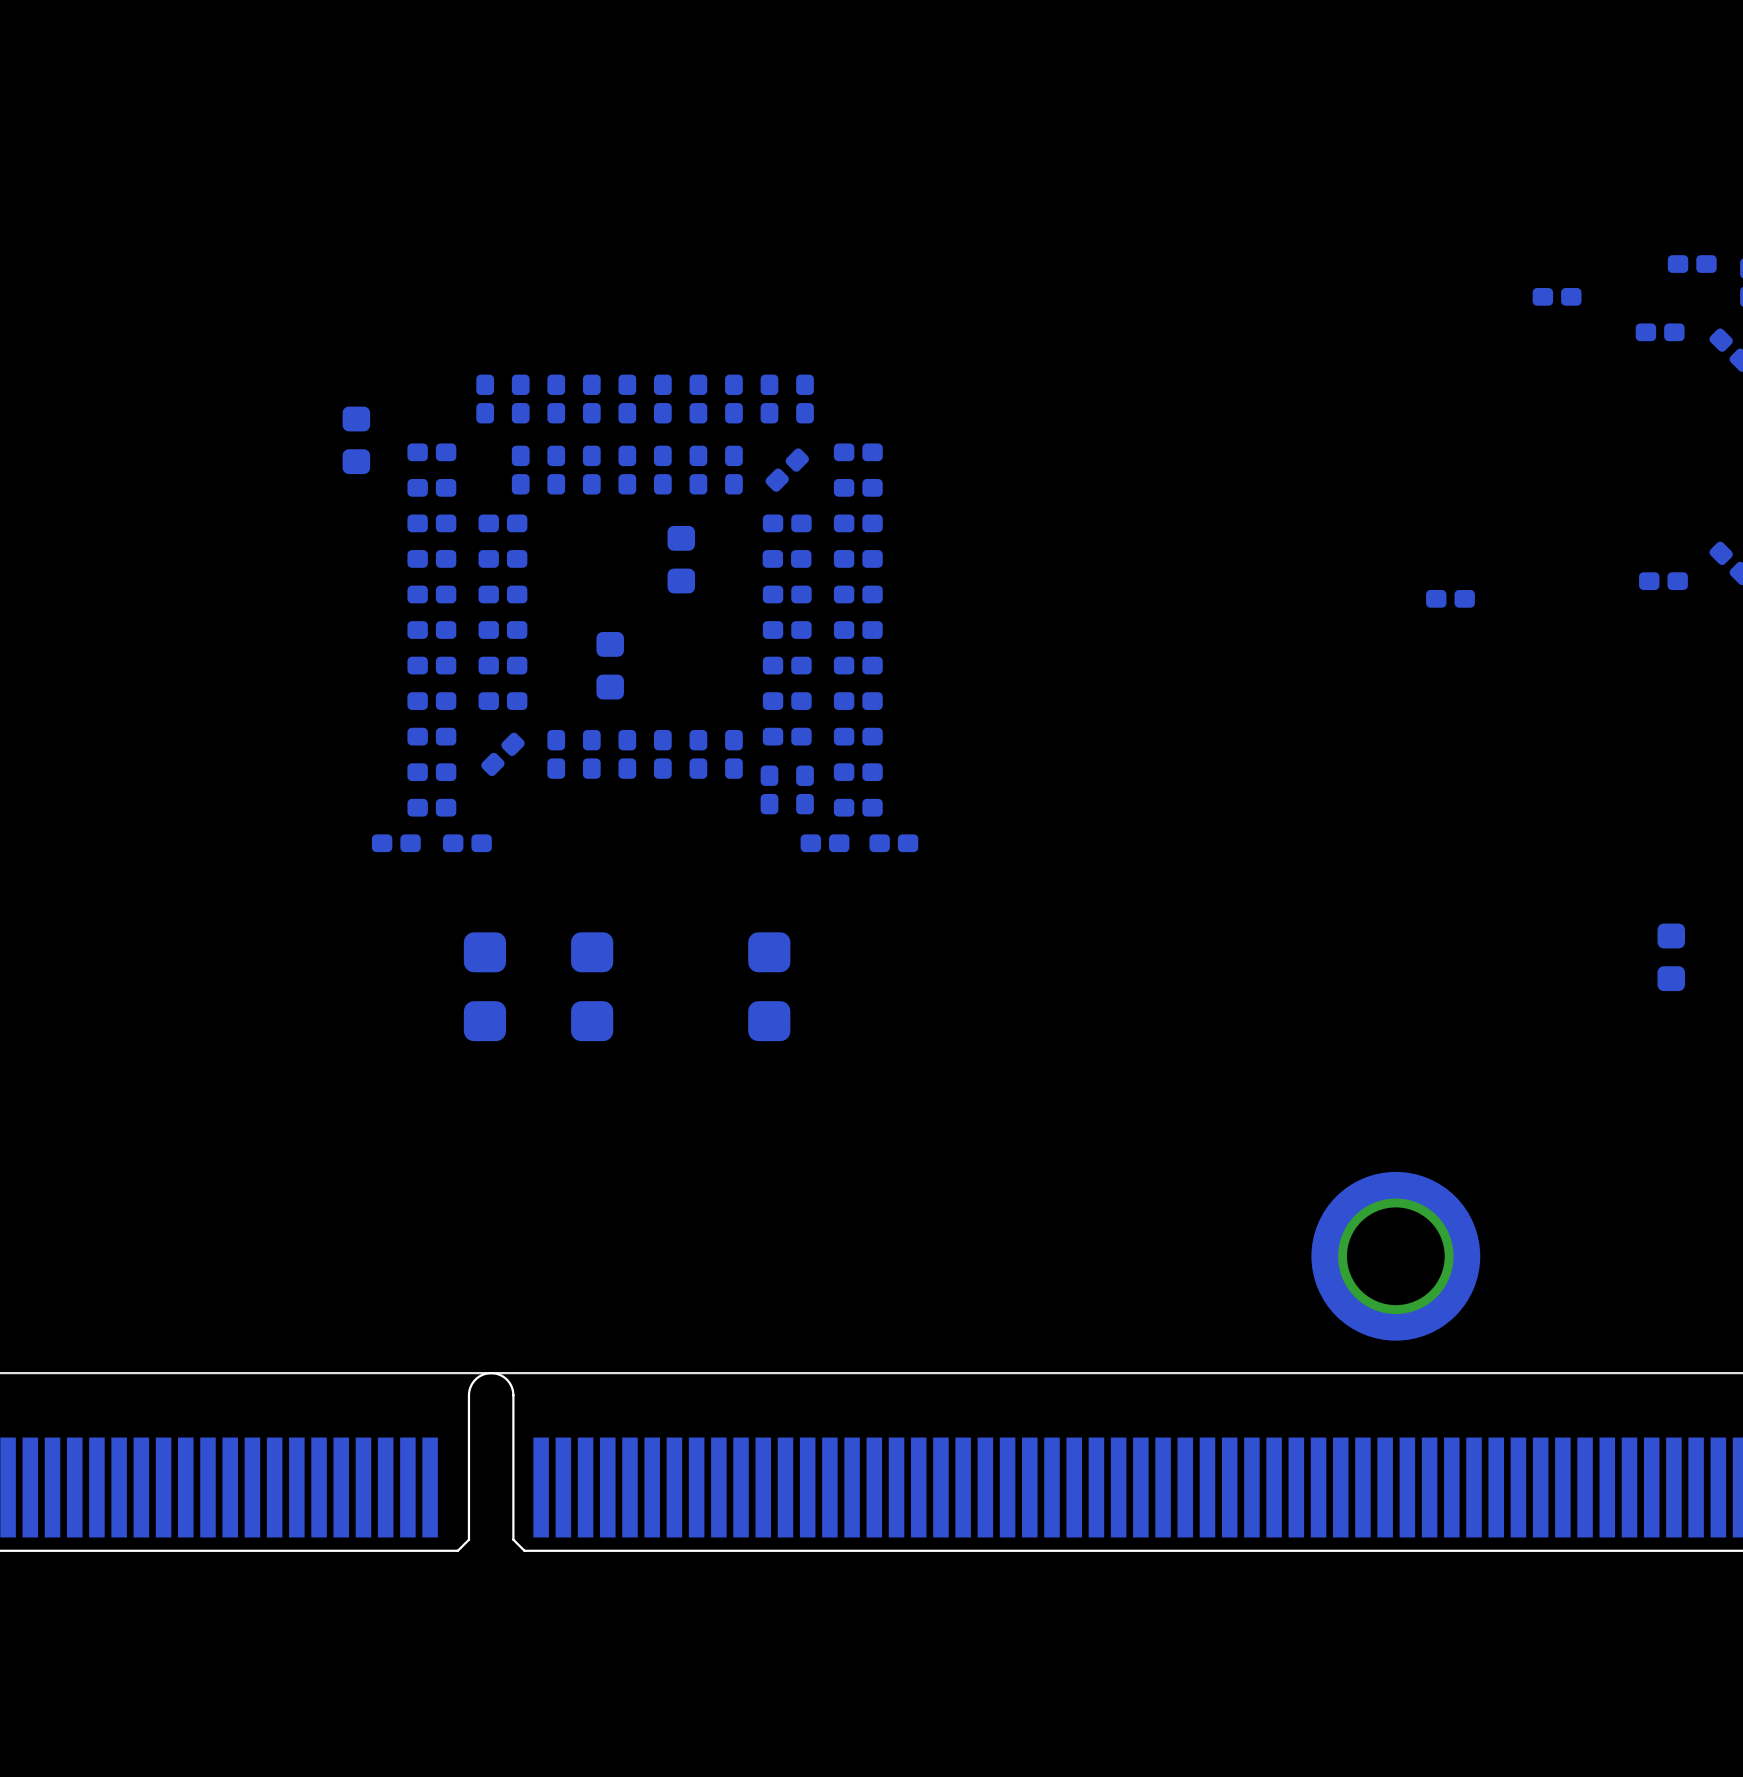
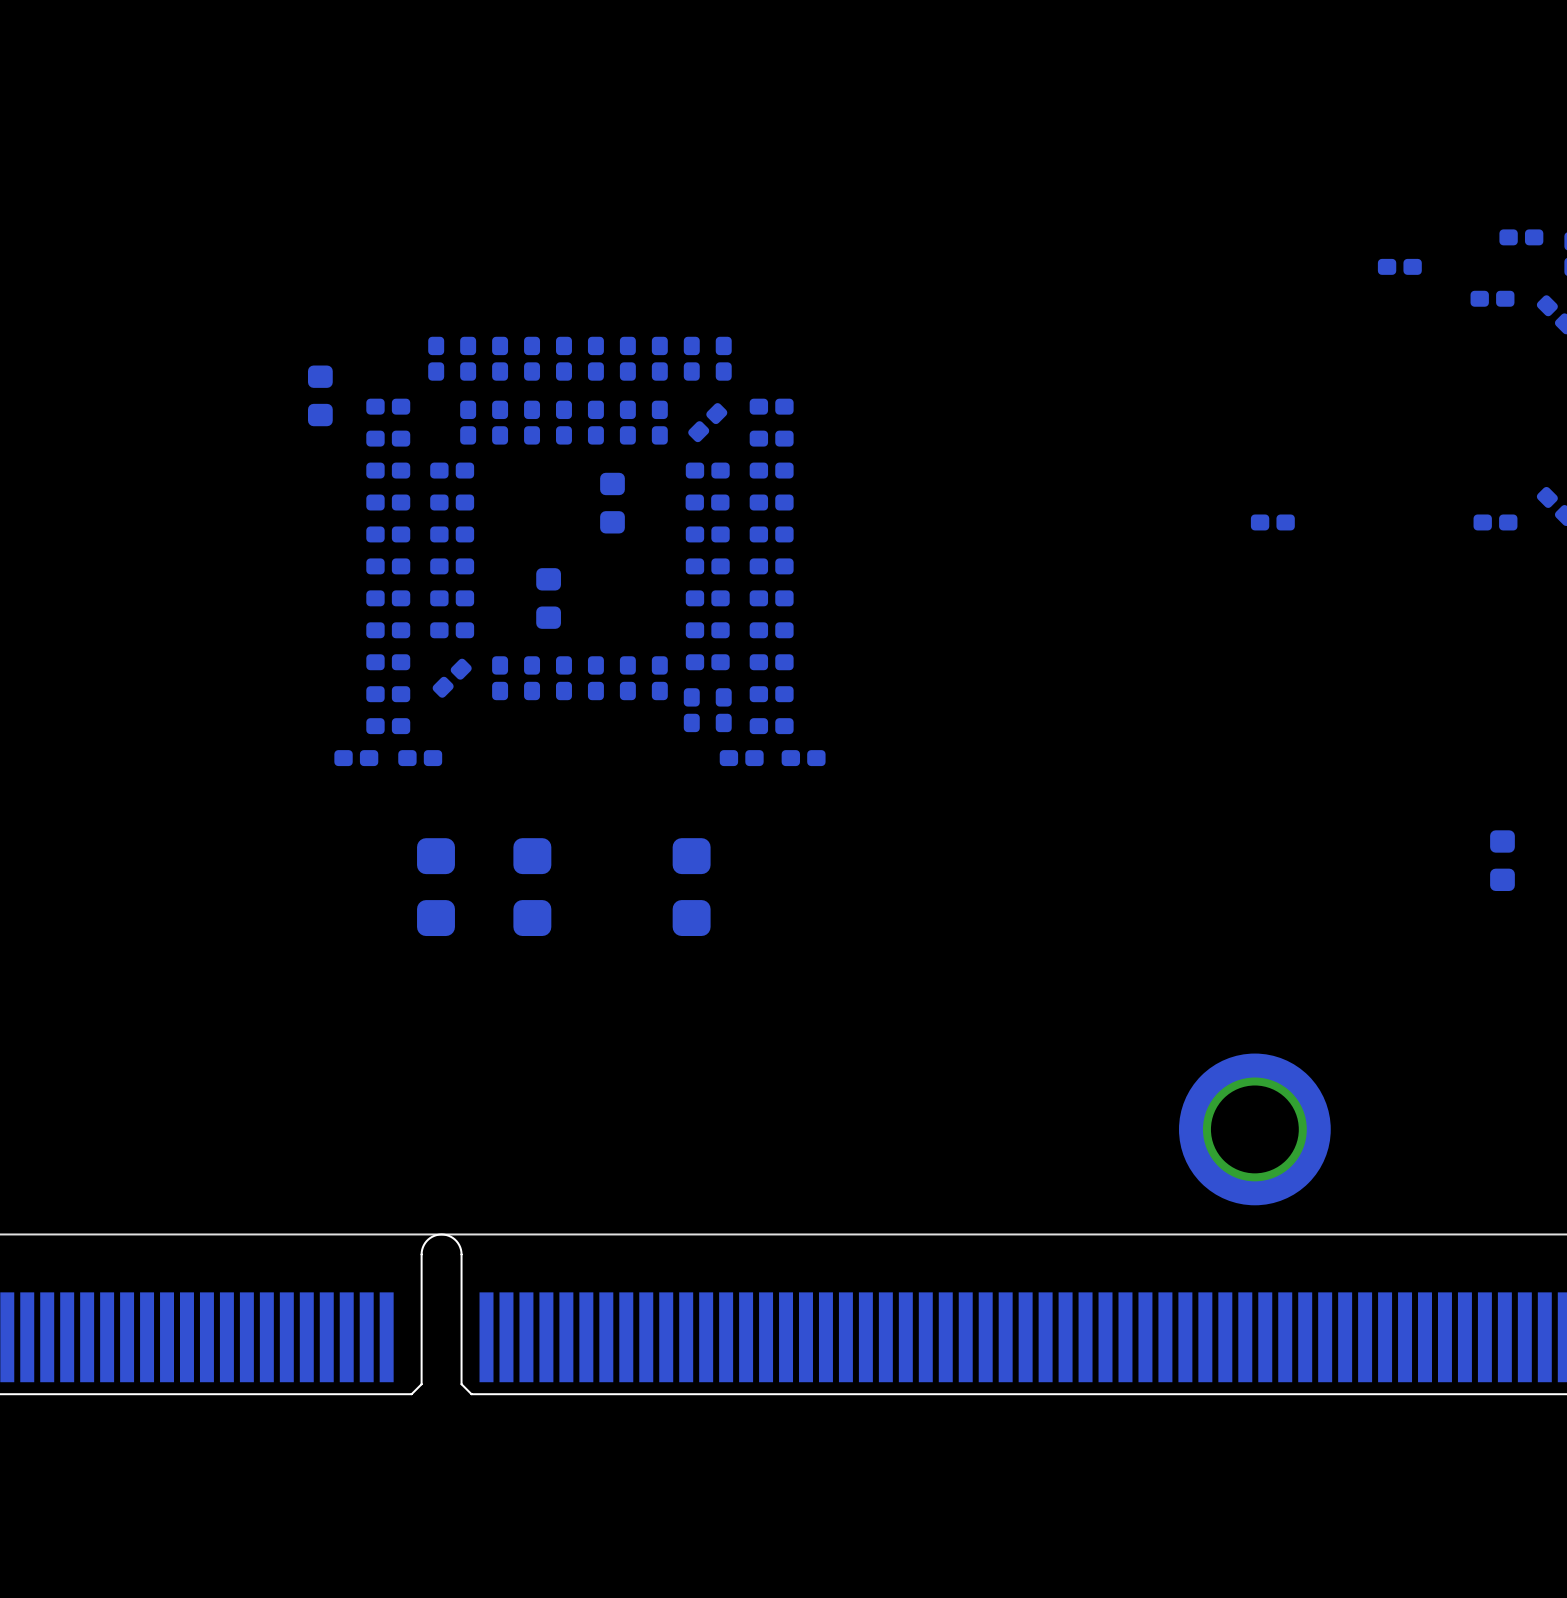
part position: (1450, 598) -> (1272, 522)

